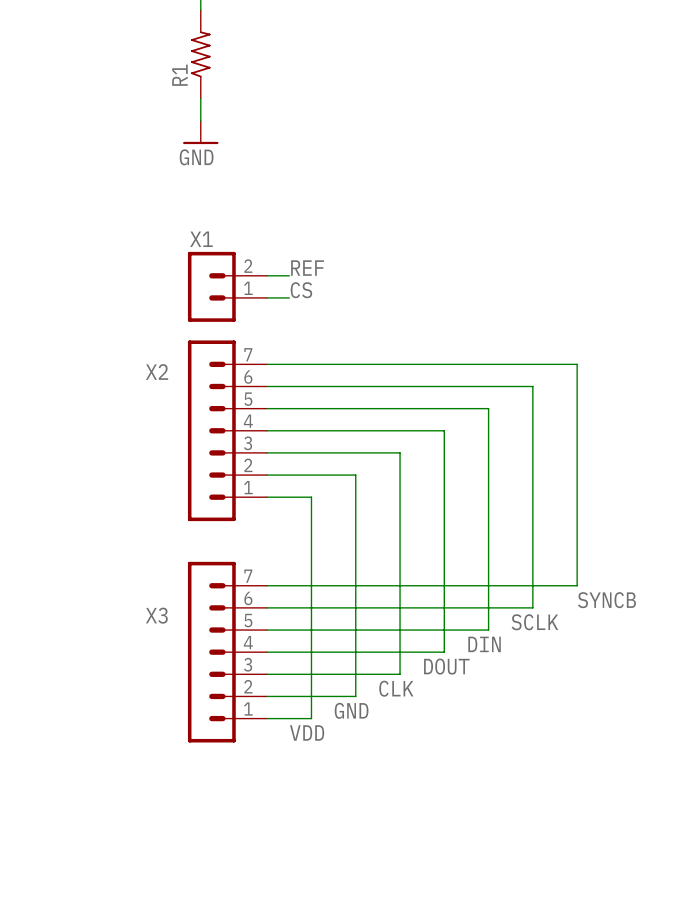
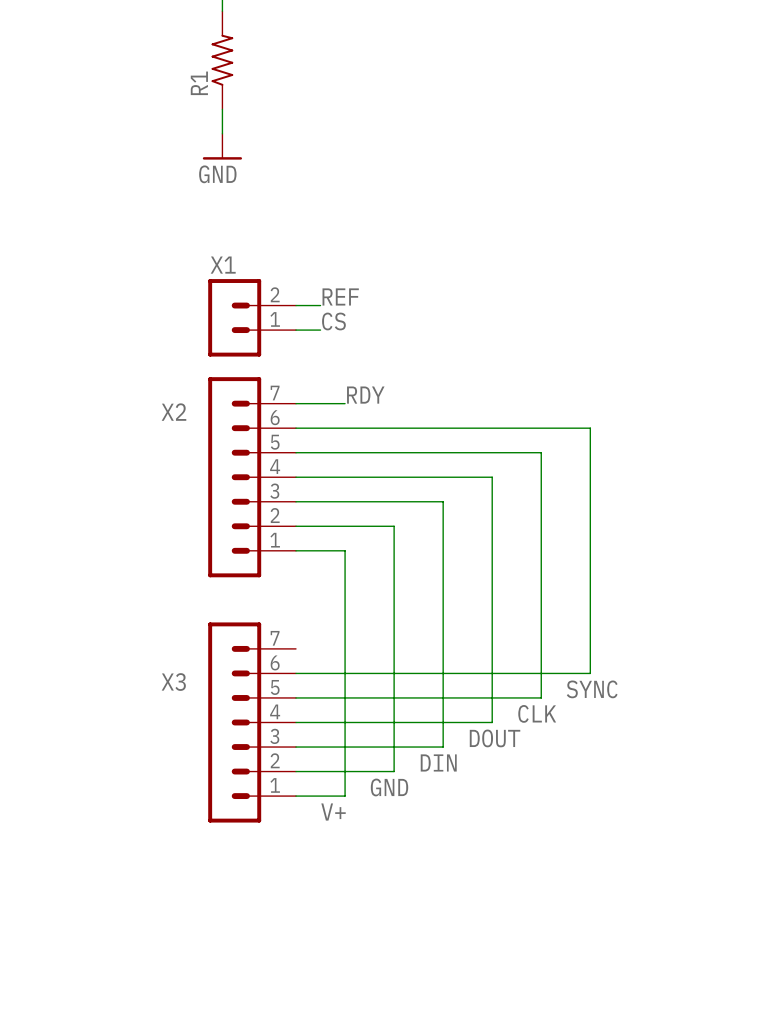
label: none -> RDY (365, 395)
wire: (311, 364) (577, 364) (577, 585) (267, 585) -> none
label: SYNCB (606, 600) -> none
label: SCLK (534, 622) -> SYNC (592, 689)
label: DIN (484, 644) -> CLK (537, 713)
label: CLK (396, 688) -> DIN (438, 762)
label: VDD (307, 732) -> V+ (333, 812)

